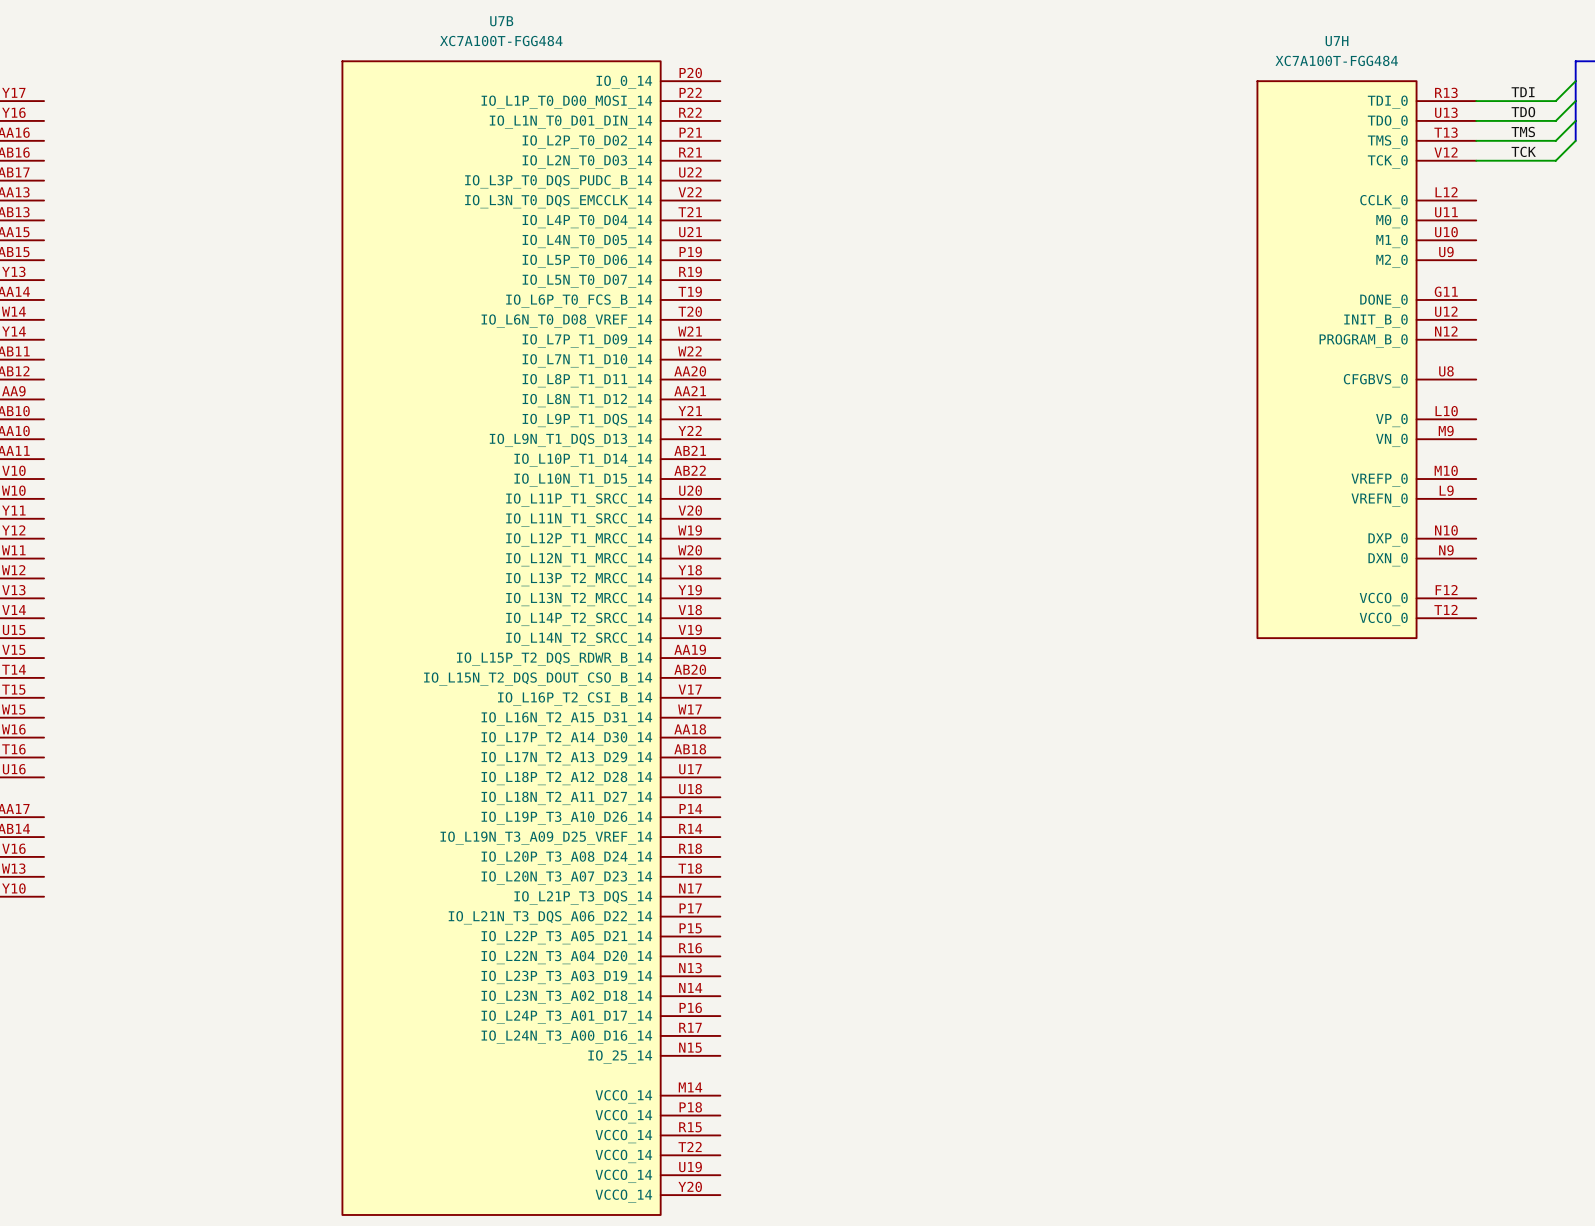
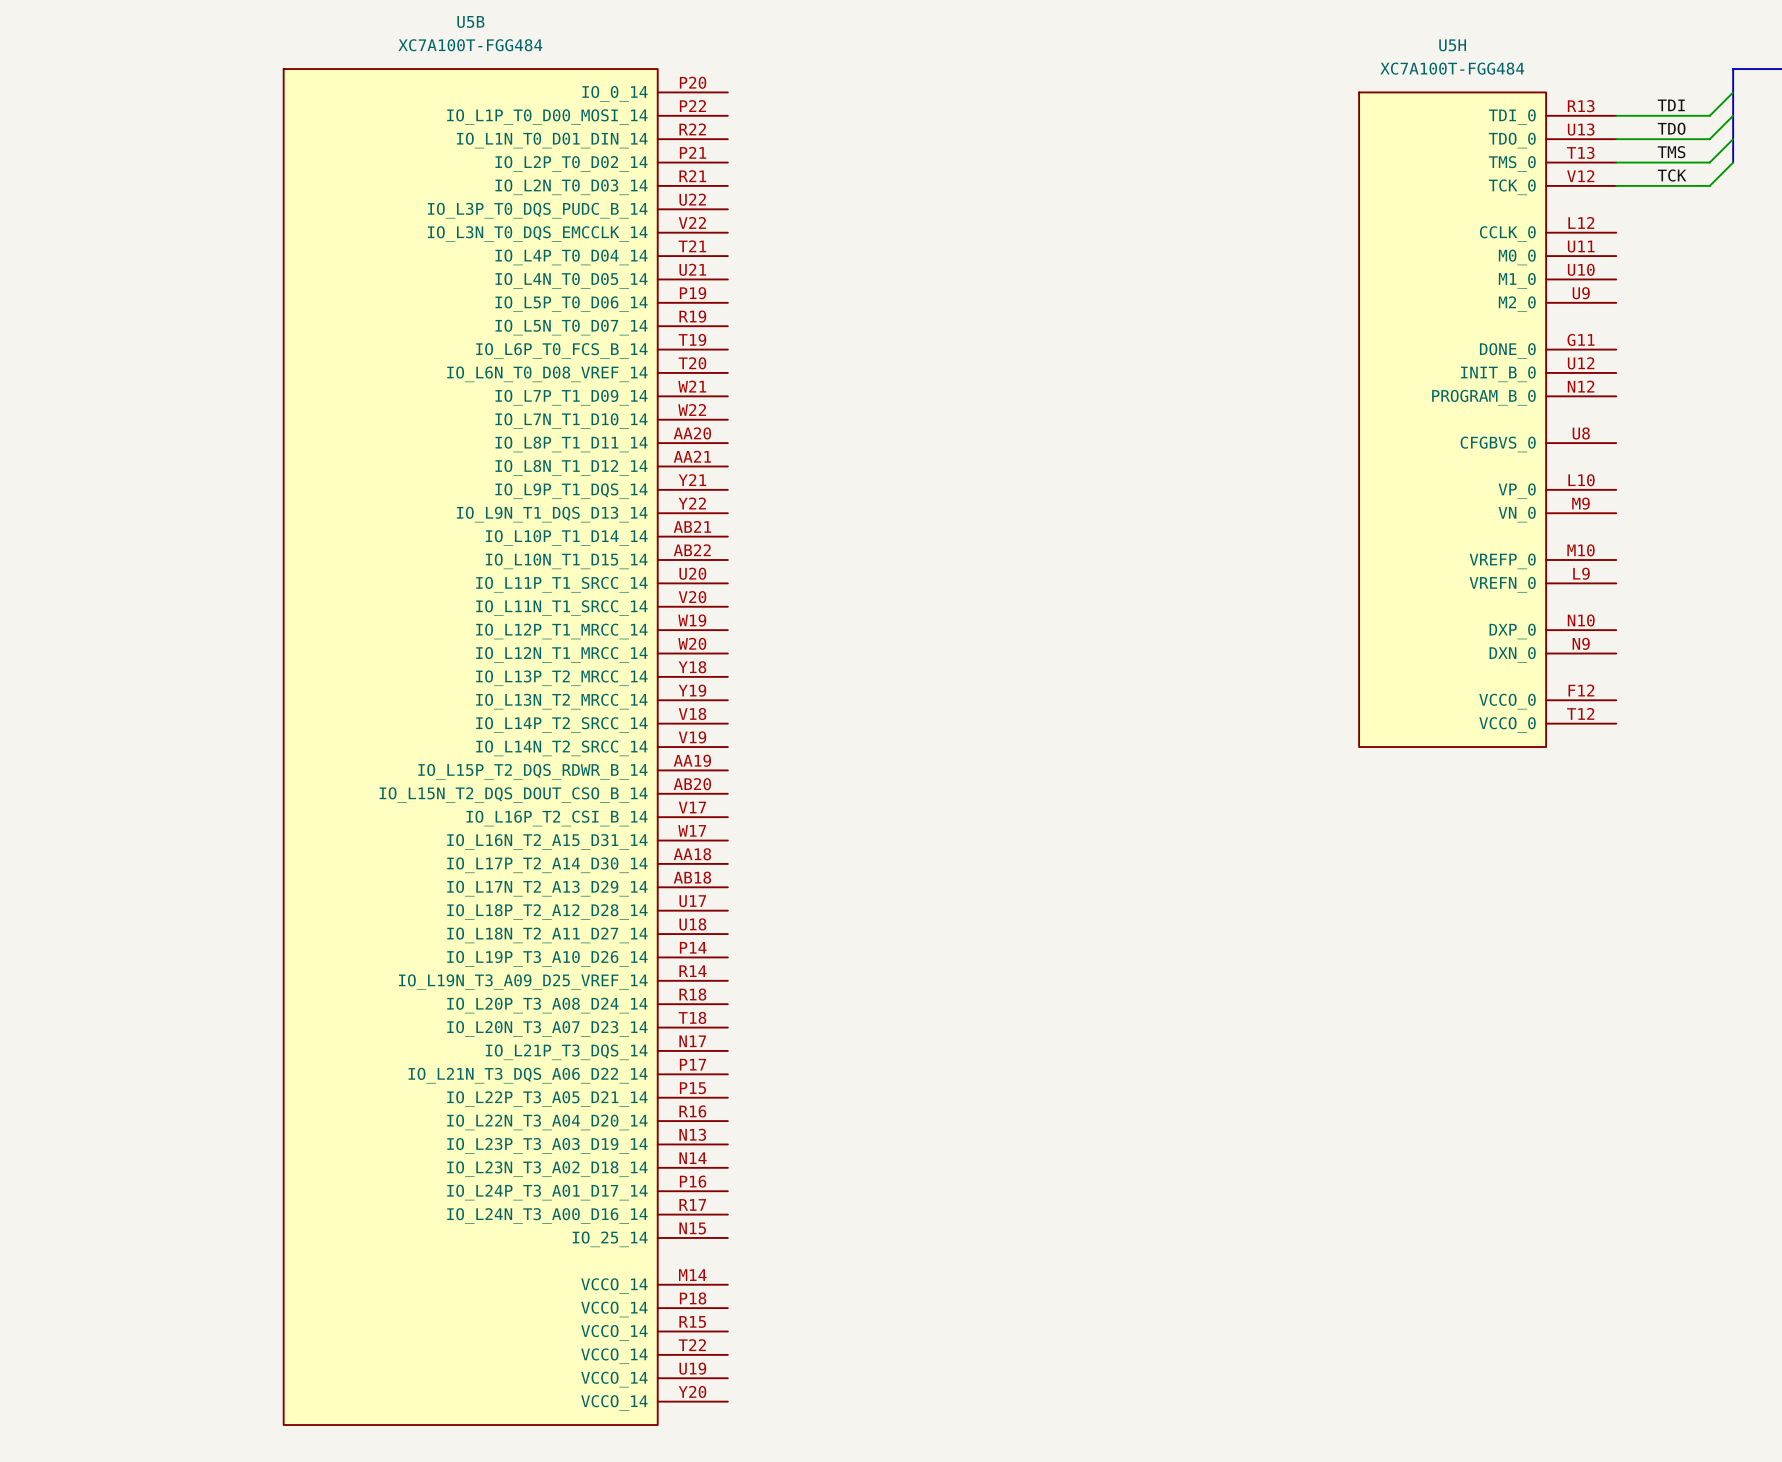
U7B name: U7B (501, 21) -> U5B (470, 21)
U7H name: U7H (1337, 41) -> U5H (1452, 45)

